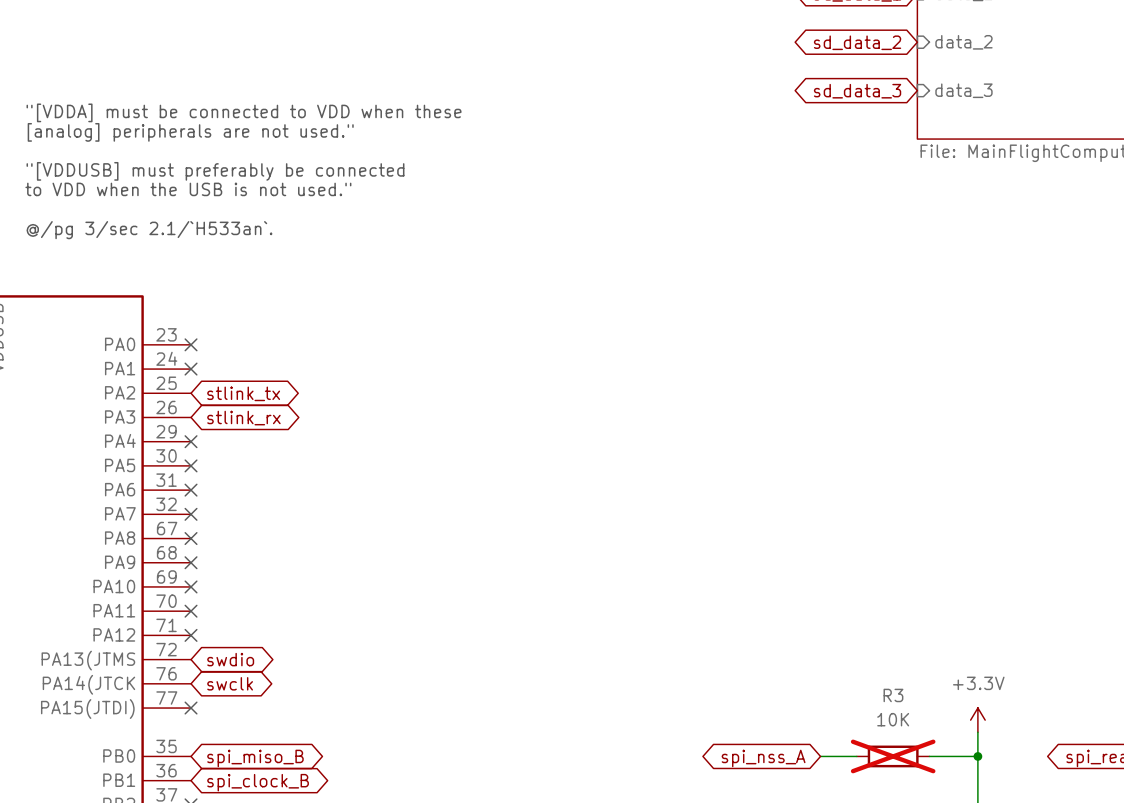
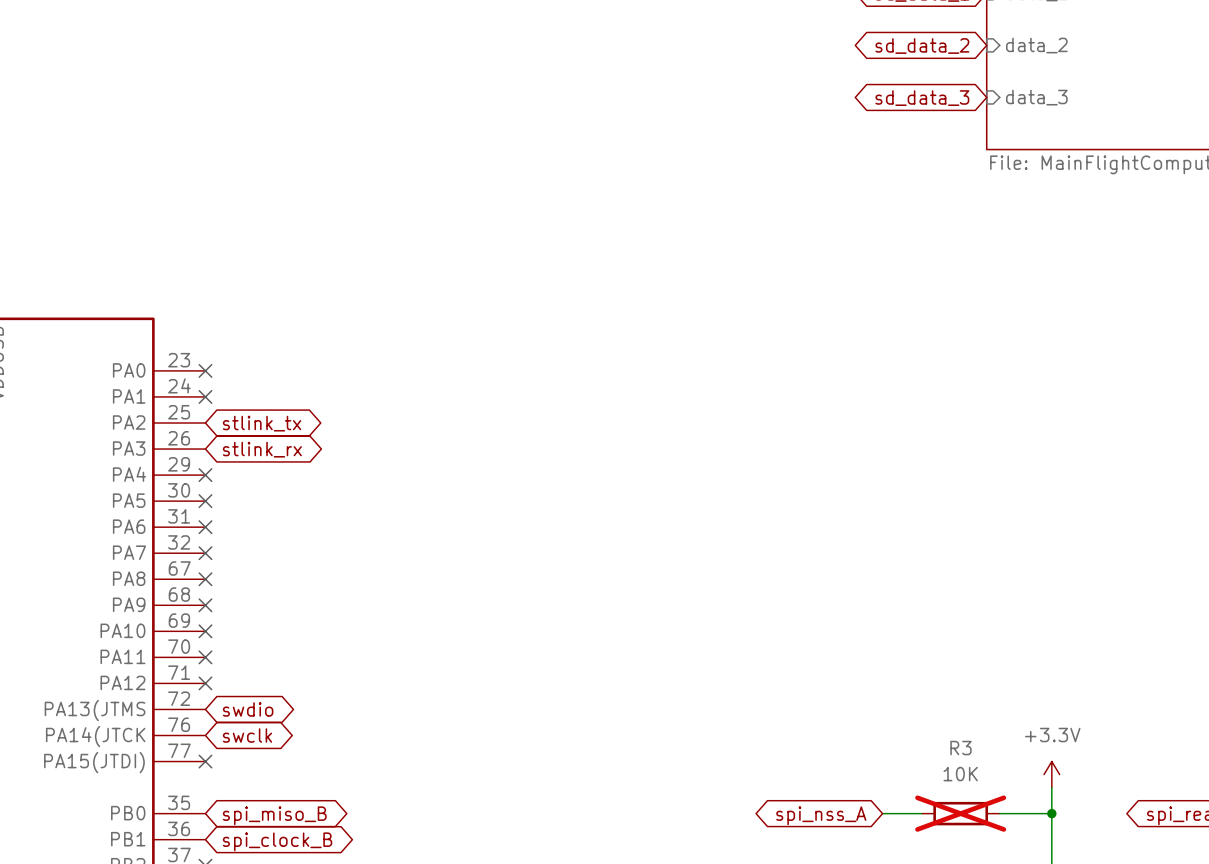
text: "[VDDA] must be connected to VDD when these (244, 112) -> none
text: [analog] peripherals are not used." (190, 132) -> none
text: "[VDDUSB] must preferably be connected (215, 171) -> none
text: to VDD when the USB is not used." (188, 189) -> none
text: @/pg 3/sec 2.1/`H533an`. (149, 230) -> none

